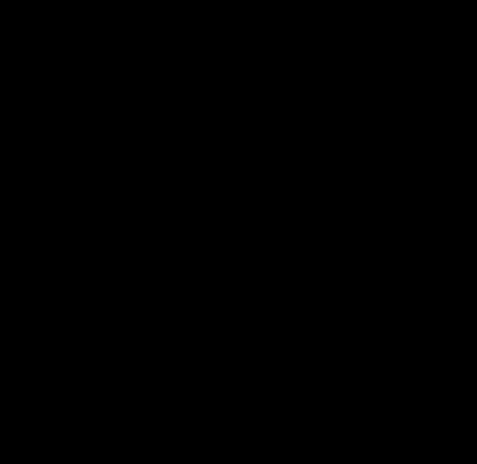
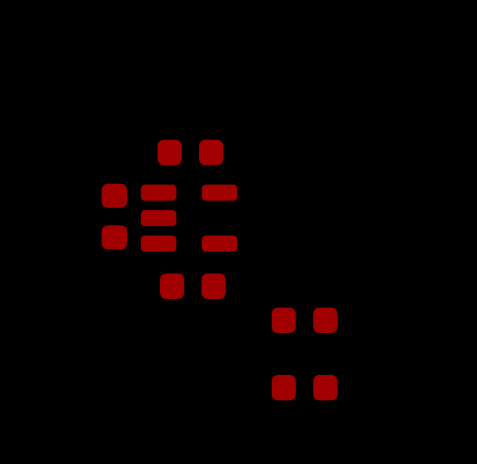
part: none -> (190, 152)
part: none -> (114, 216)
part: none -> (189, 218)
part: none -> (192, 286)
part: none -> (304, 320)
part: none -> (304, 387)

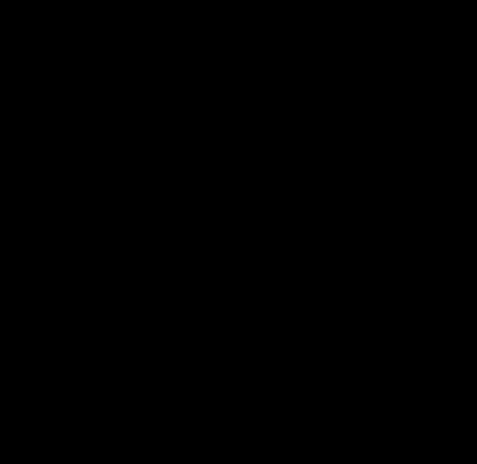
part: (190, 152) -> none
part: (114, 216) -> none
part: (189, 218) -> none
part: (192, 286) -> none
part: (304, 320) -> none
part: (304, 387) -> none

